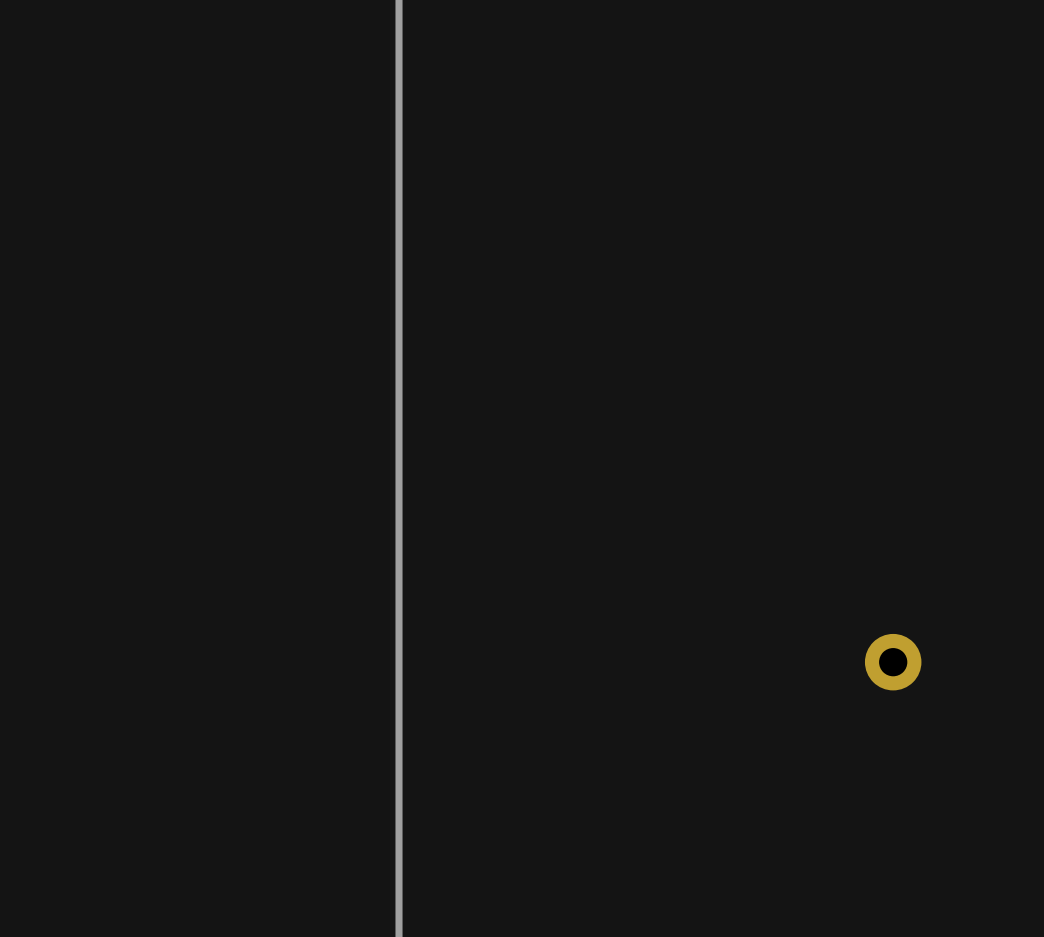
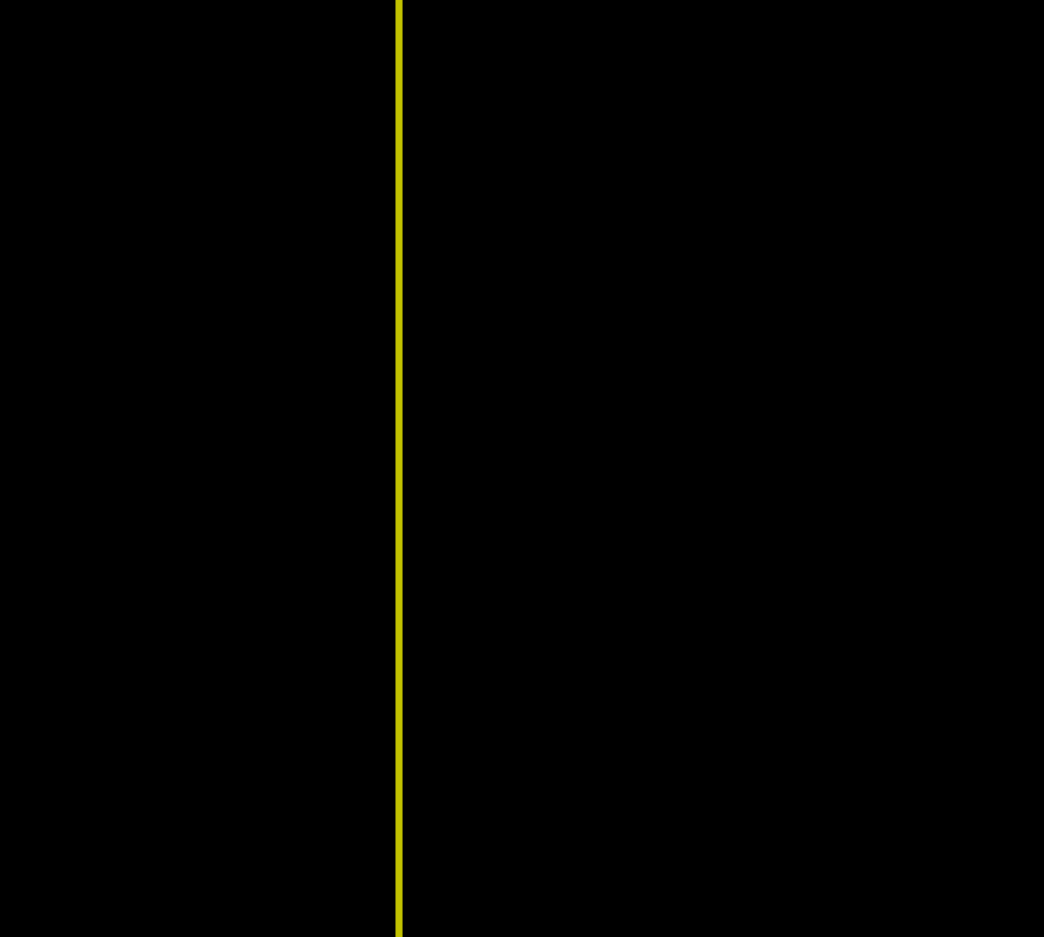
via: (893, 662) -> none

